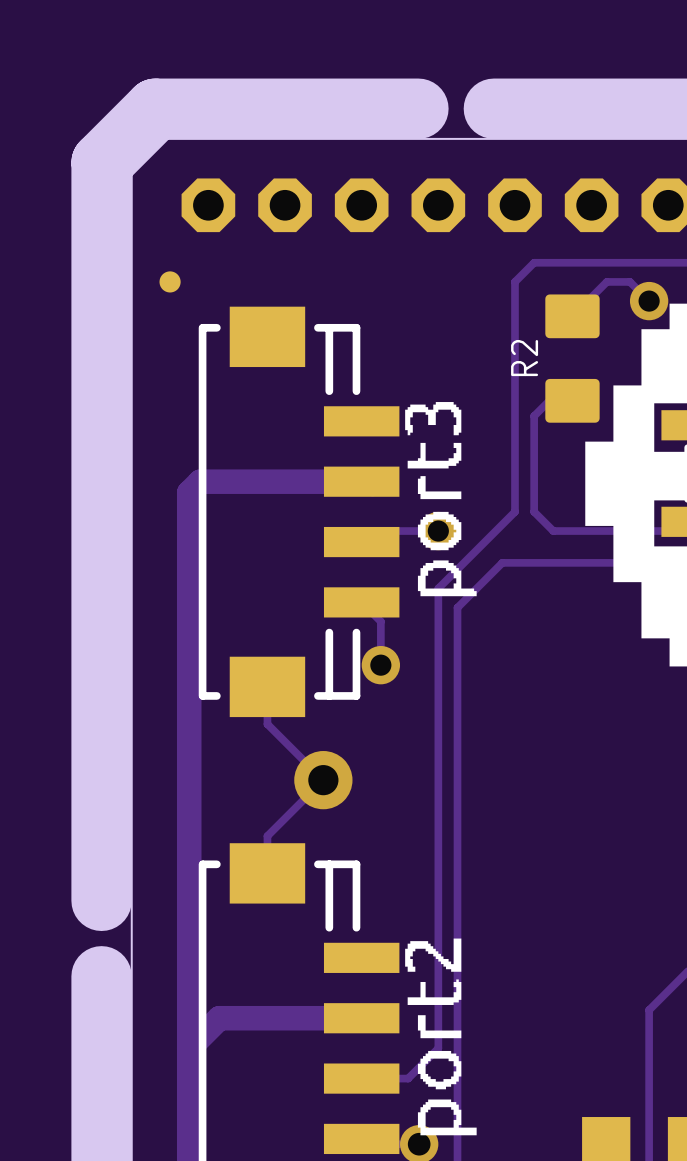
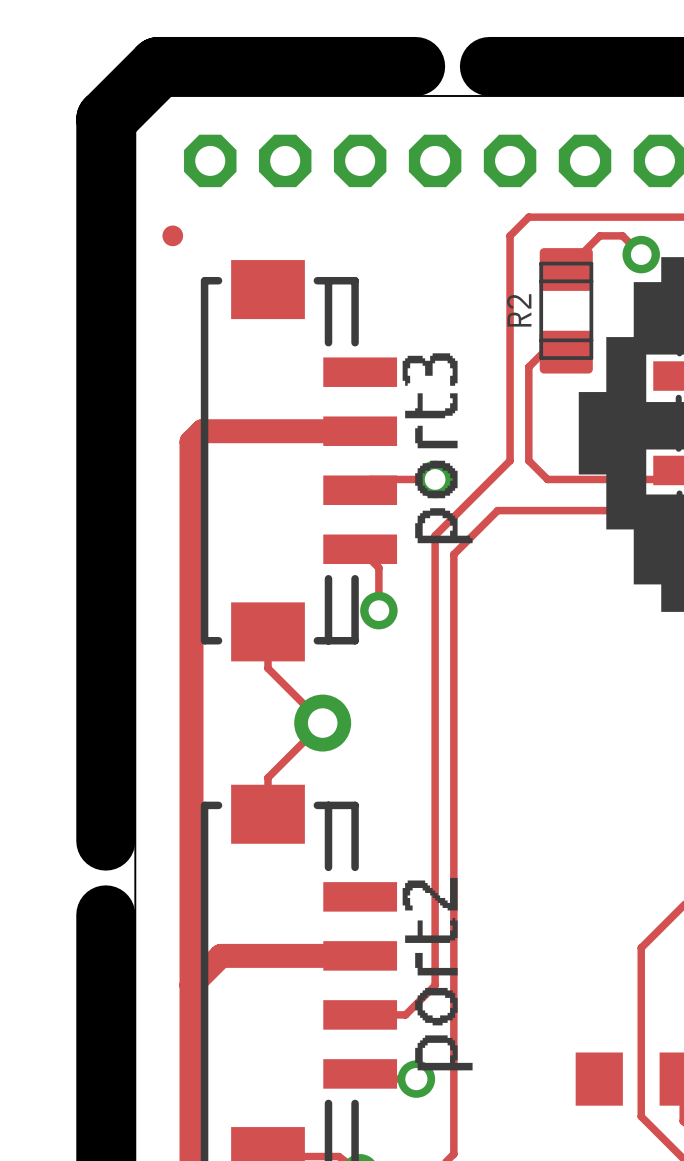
R2 footprint: [545, 294, 600, 423] -> [539, 248, 594, 374]

